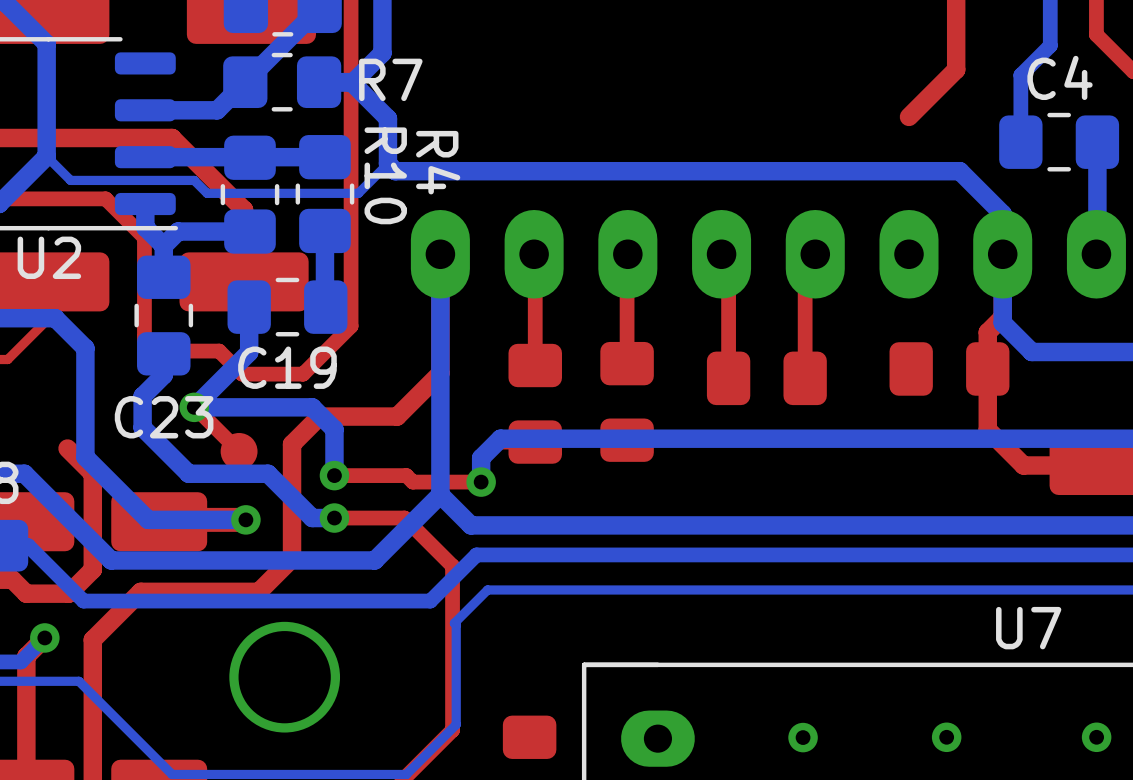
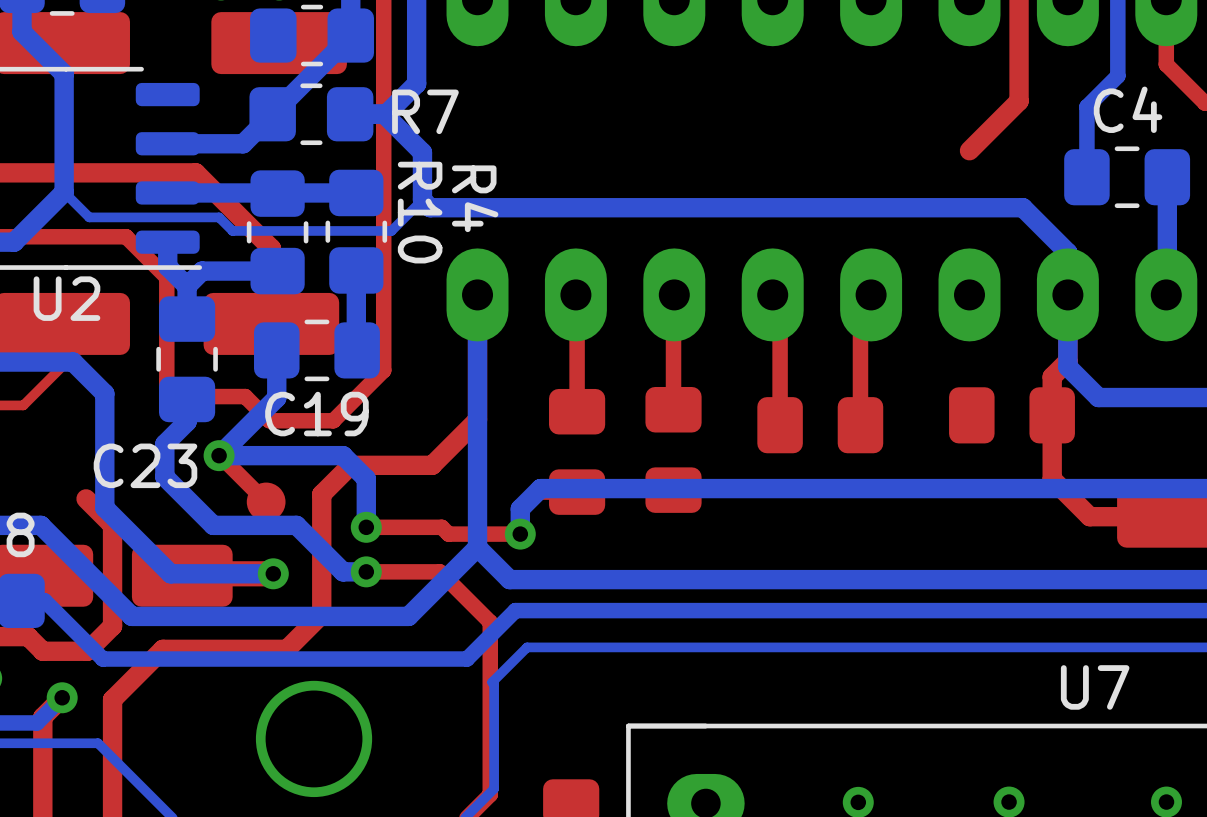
C23 name position: C23 (164, 417) -> C23 (145, 465)

